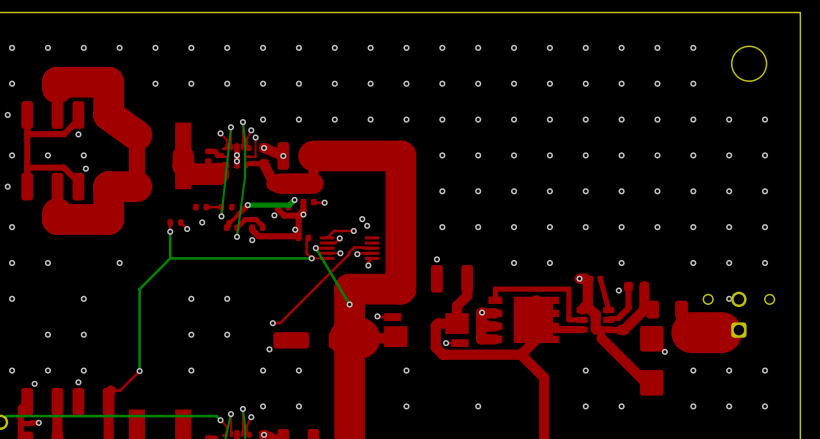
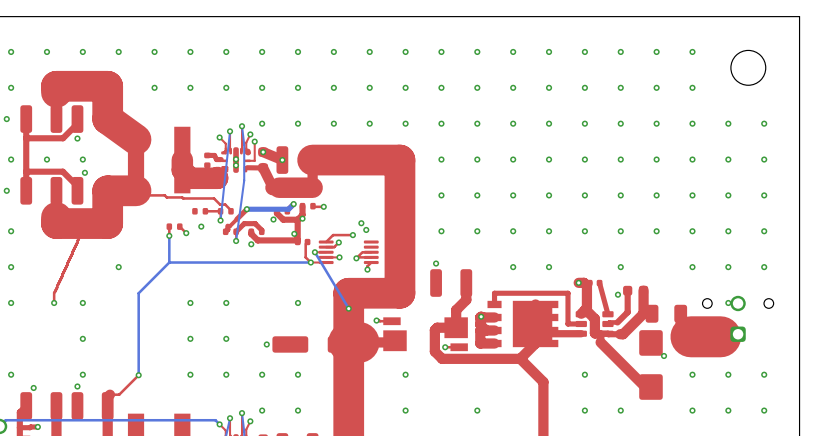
top track: none -> (150, 195) (213, 198) (220, 204) (225, 204) (229, 208)
top track: none -> (78, 238) (54, 292) (54, 302)
top track: (364, 248) (354, 247) (280, 323) (272, 323) -> none
via: (47, 262) -> none
via: none -> (54, 302)
via: none -> (298, 302)
via: (272, 323) -> none
via: (47, 334) -> none
via: none -> (266, 344)
via: (269, 349) -> none
via: (47, 370) -> none
via: none -> (226, 374)

